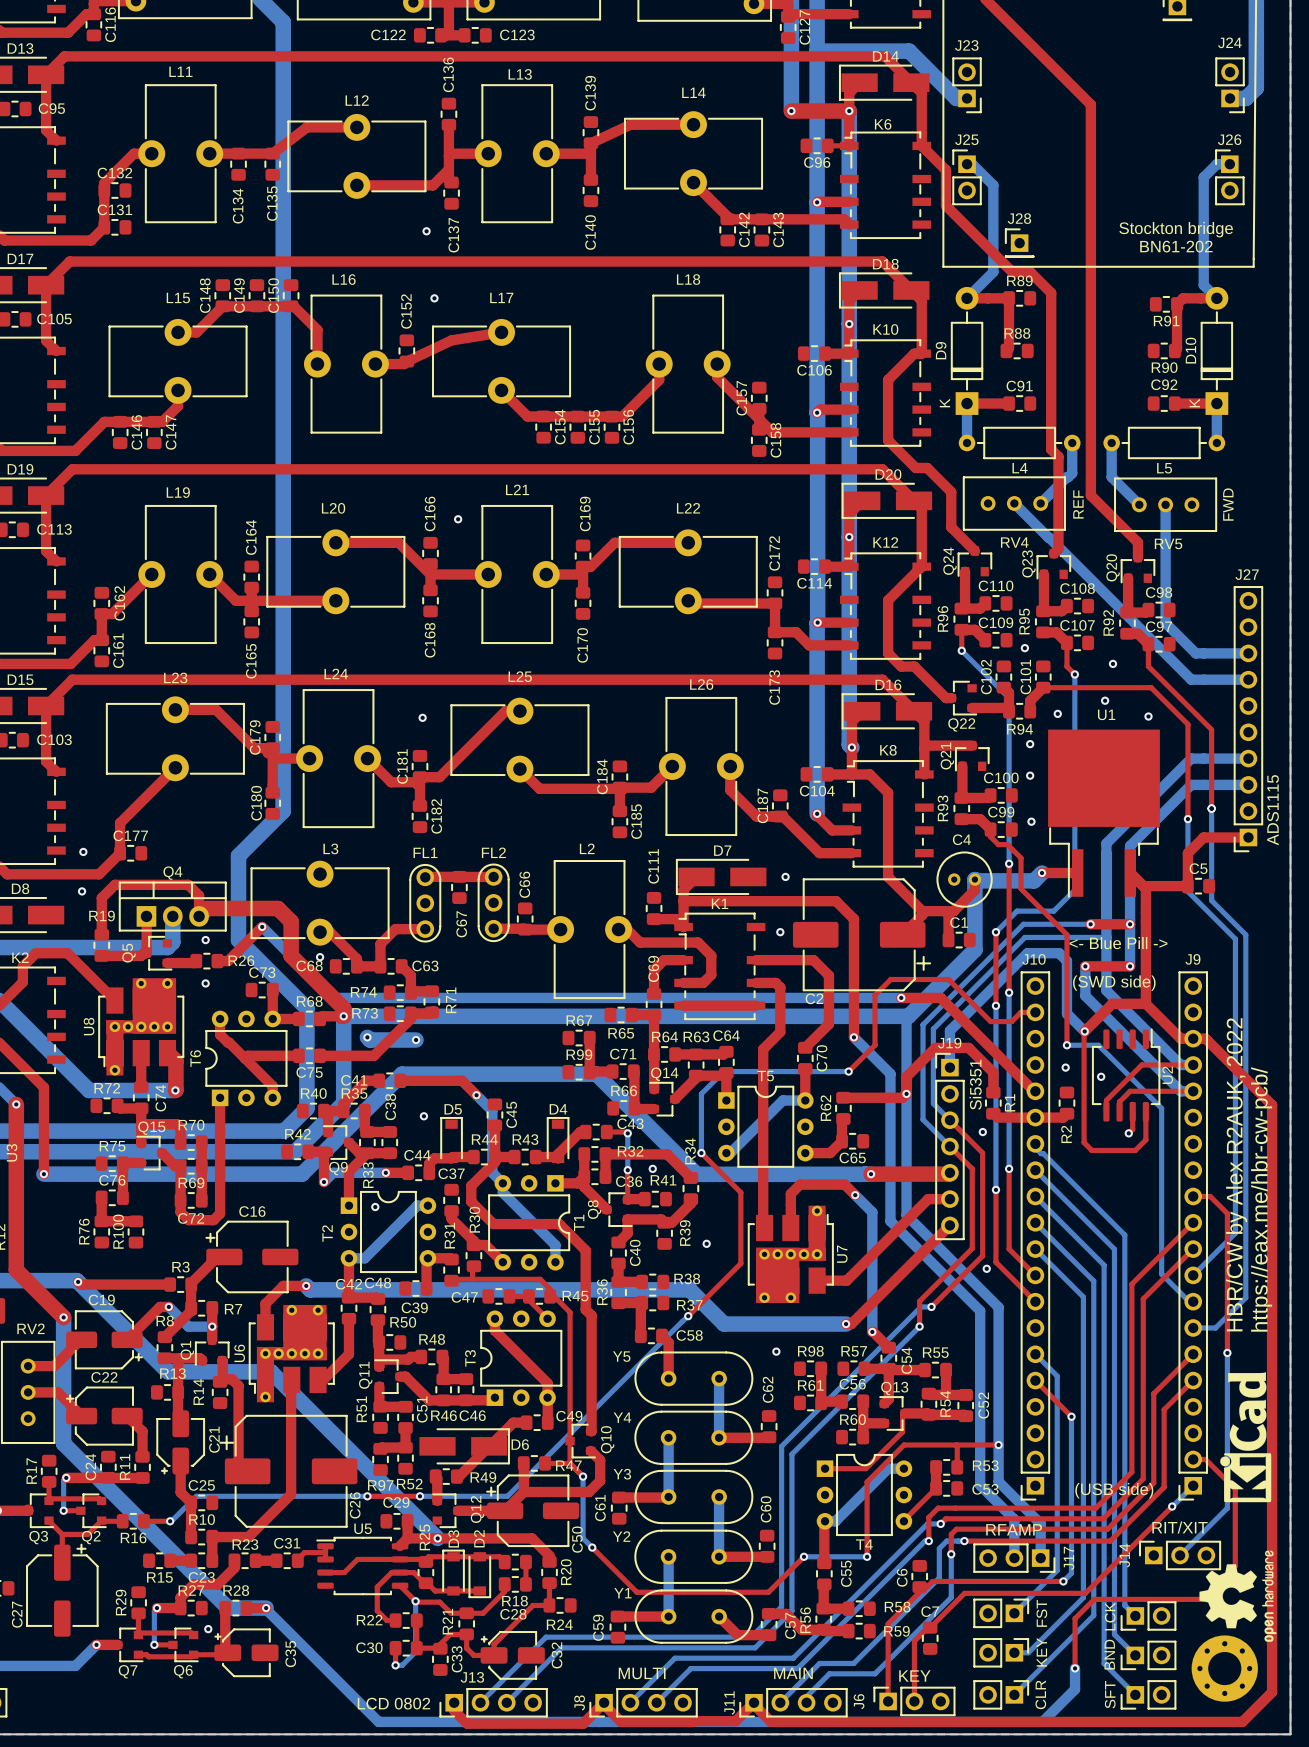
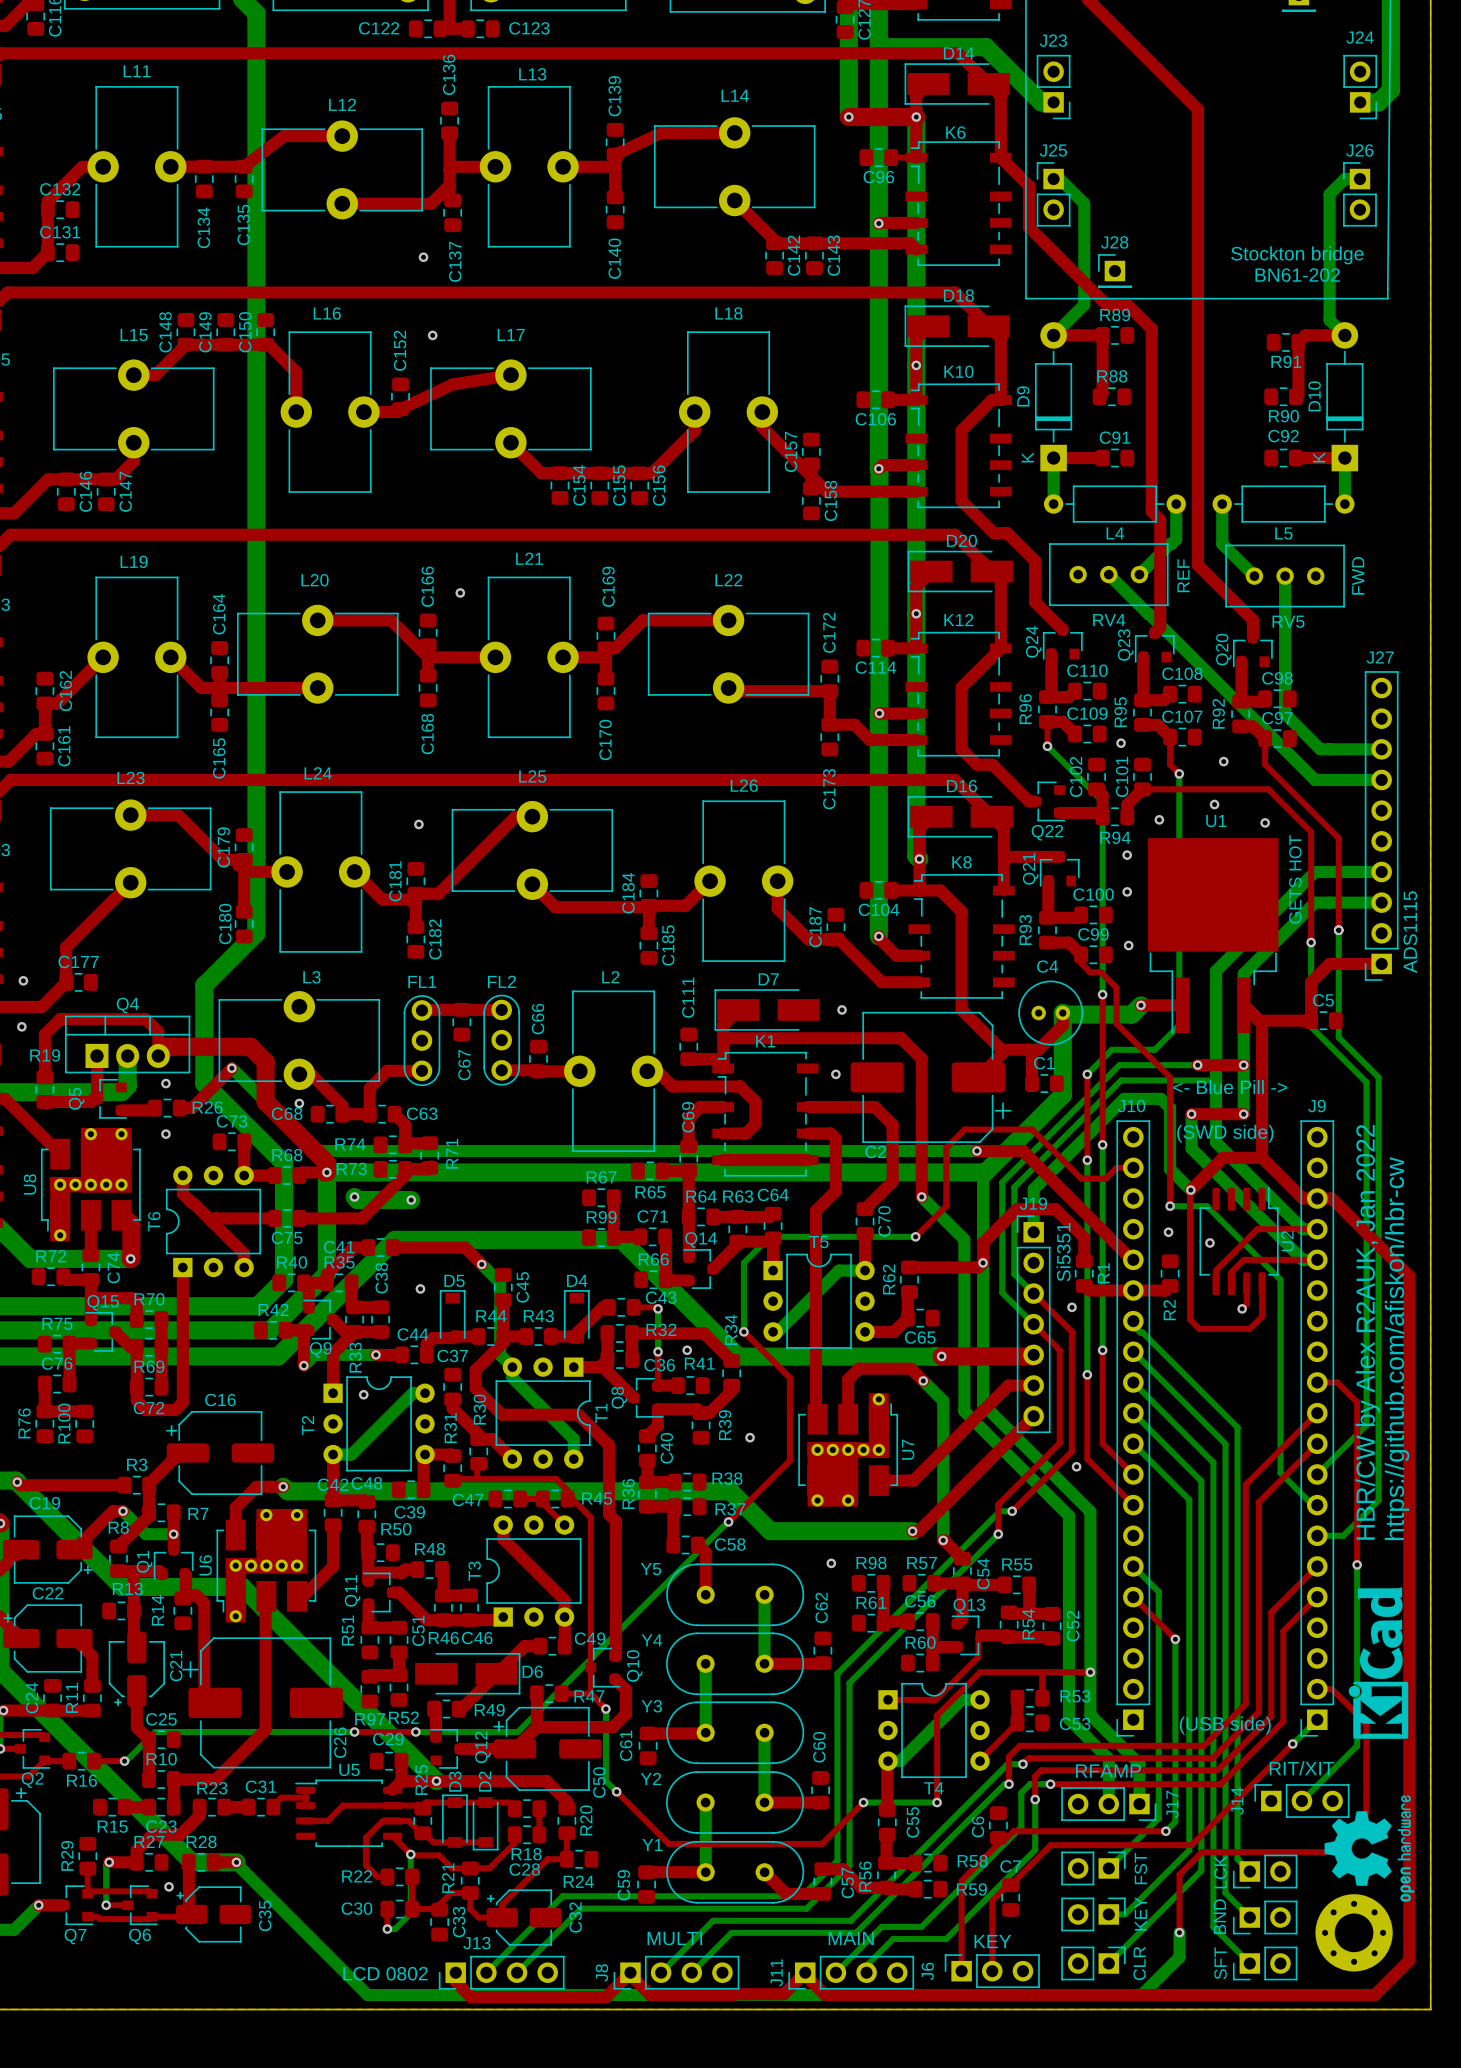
text: none -> GETS HOT (1295, 879)
text: HBR/CW by Alex R2AUK, 2022 (1236, 1174) -> HBR/CW by Alex R2AUK, Jan 2022 (1367, 1332)
text: https://eax.me/hbr-cw-pcb/ (1261, 1199) -> https://github.com/afiskon/hbr-cw (1397, 1348)

